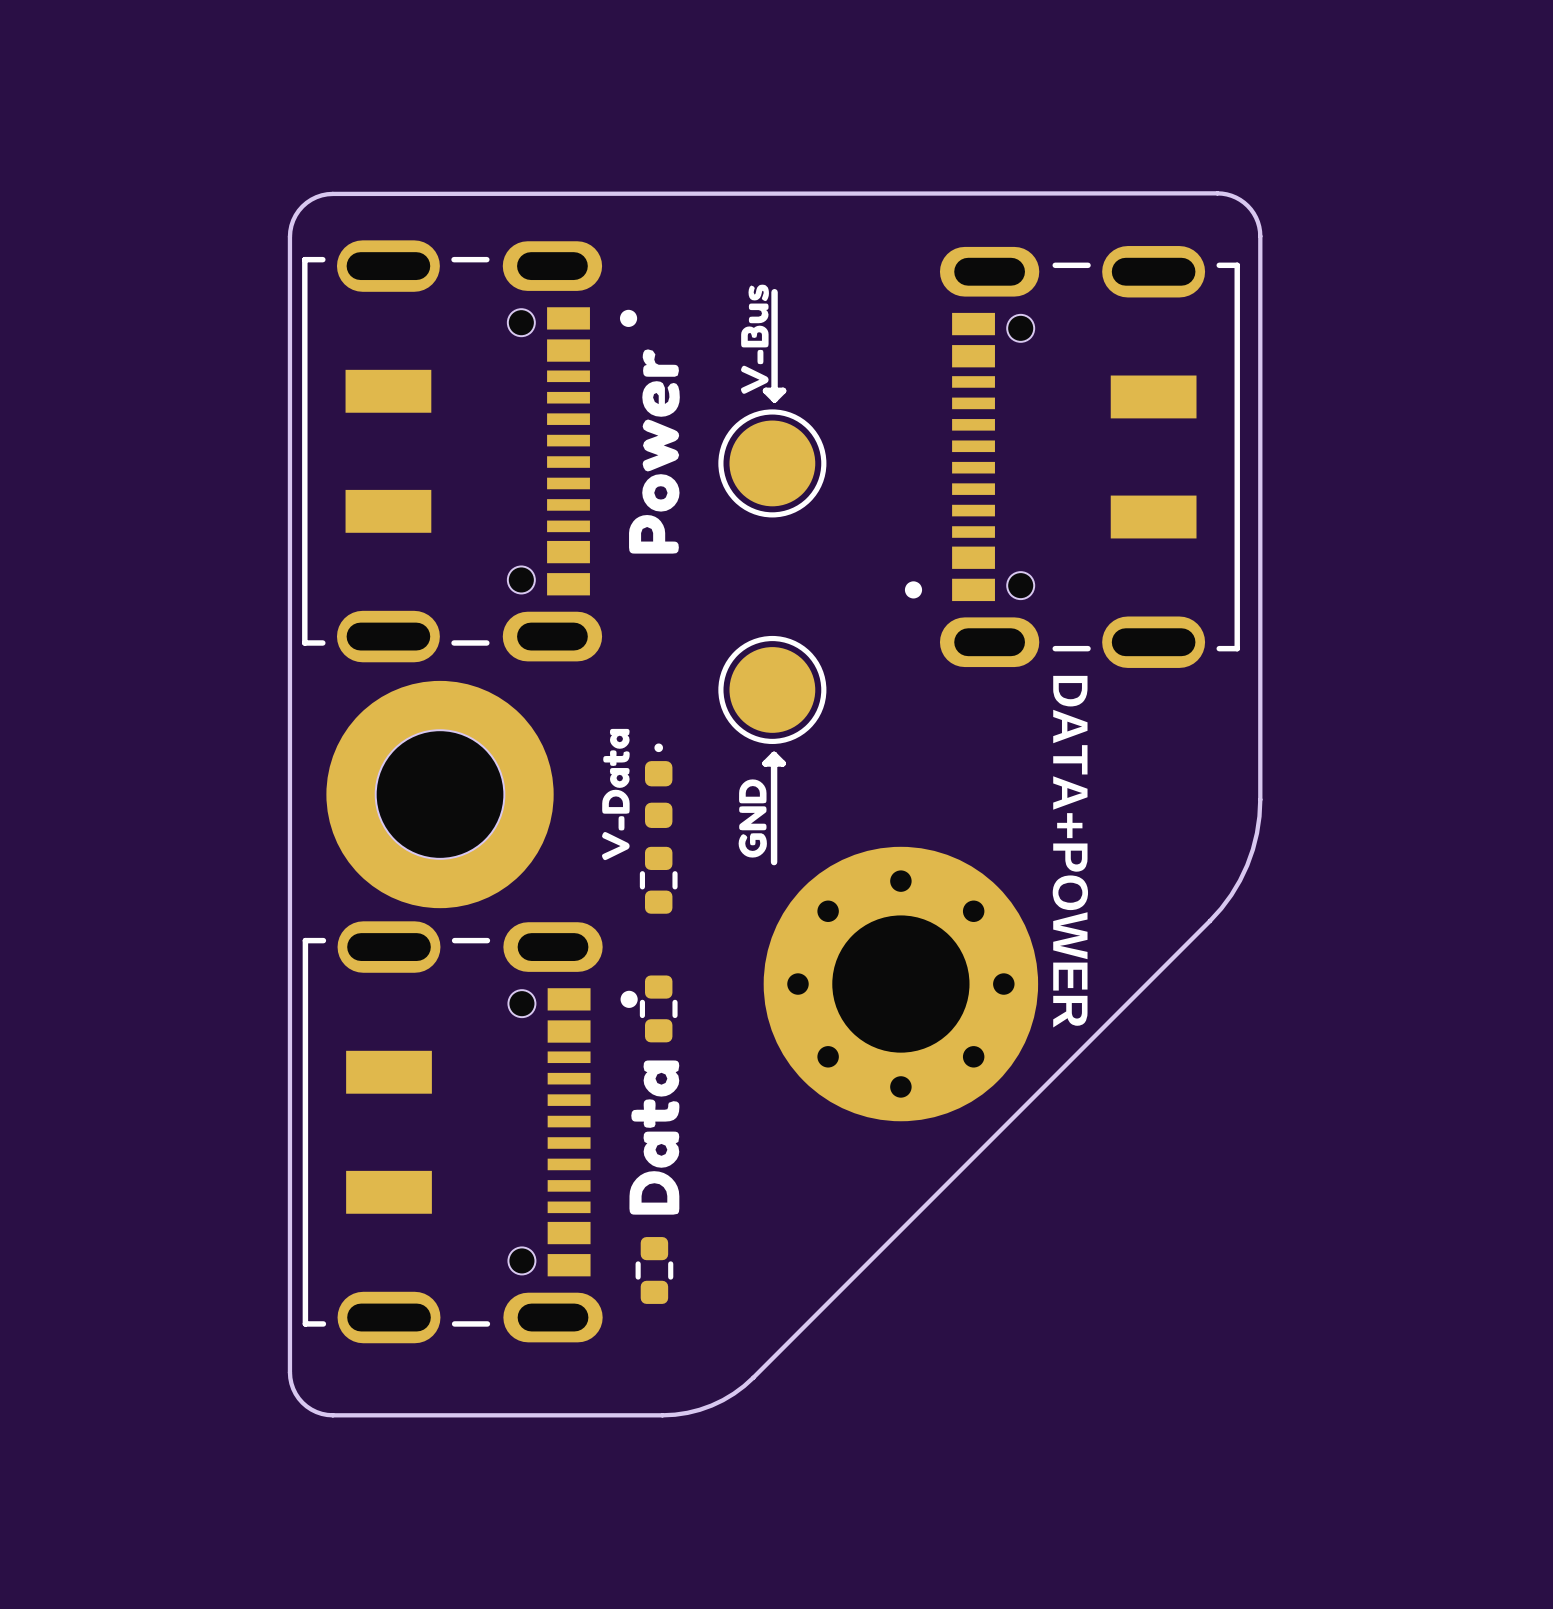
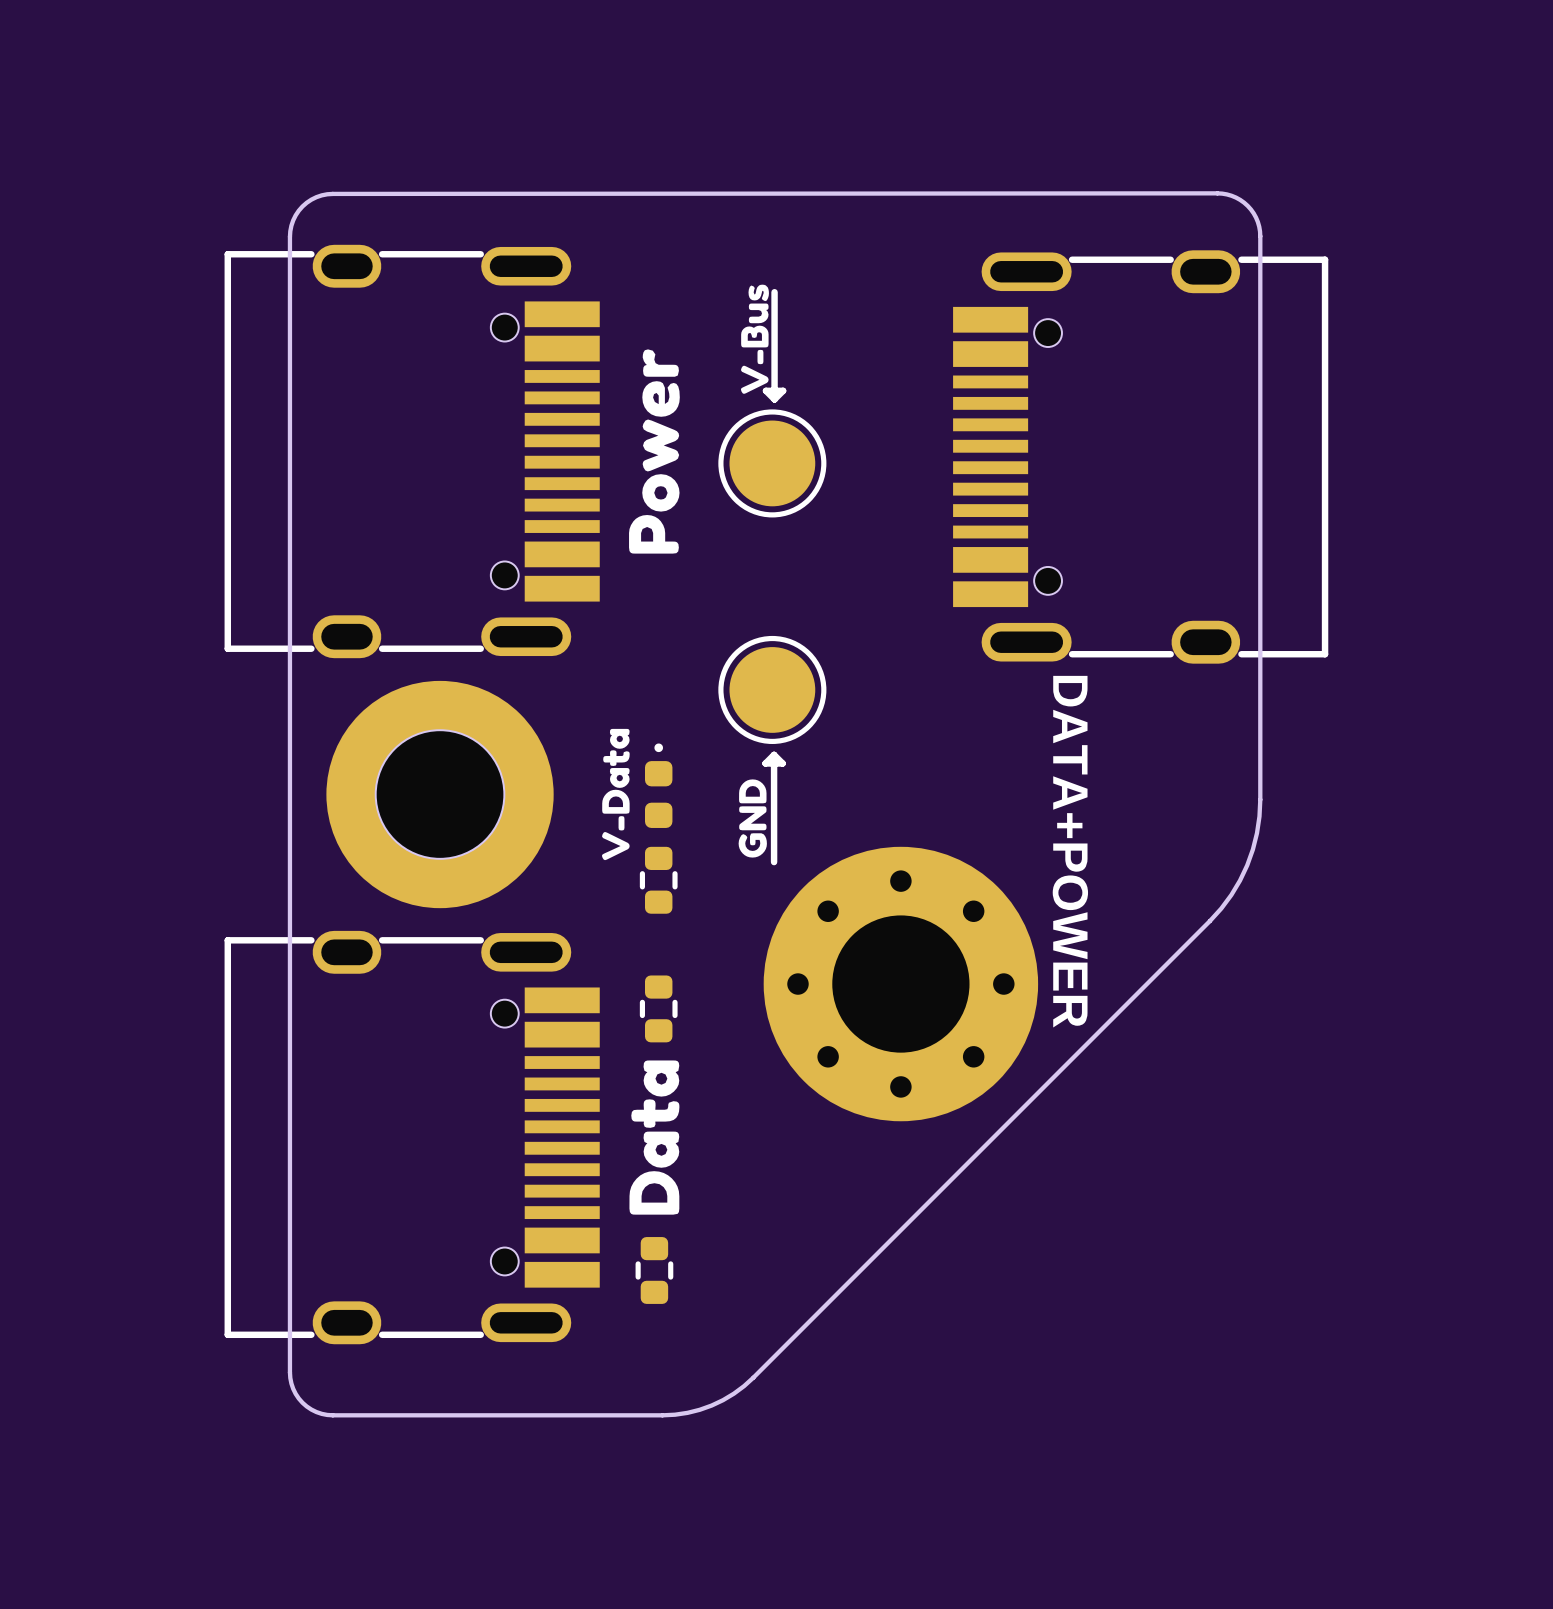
part: none -> (412, 451)
part: (469, 451) -> none
part: (1072, 456) -> none
part: none -> (1140, 456)
part: (470, 1132) -> none
part: none -> (412, 1137)

